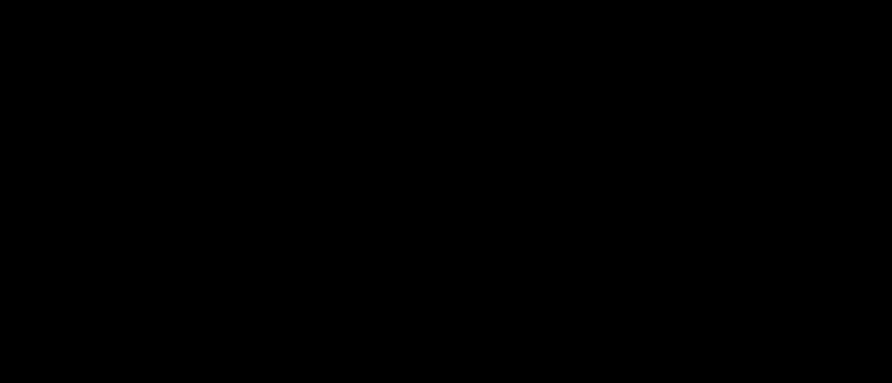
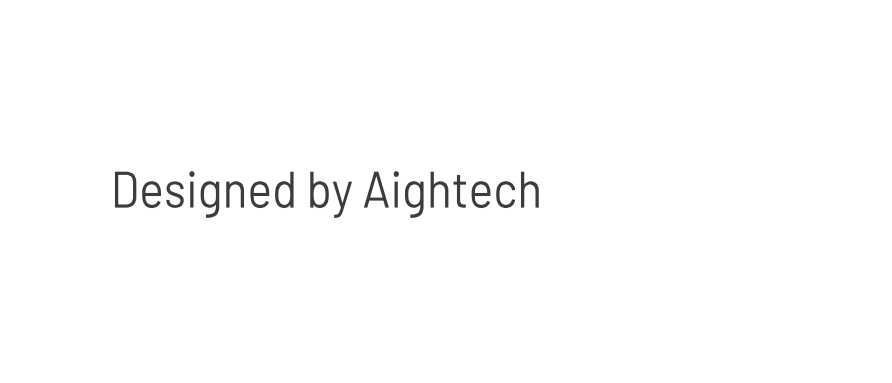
text: none -> Designed by Aightech (326, 194)

